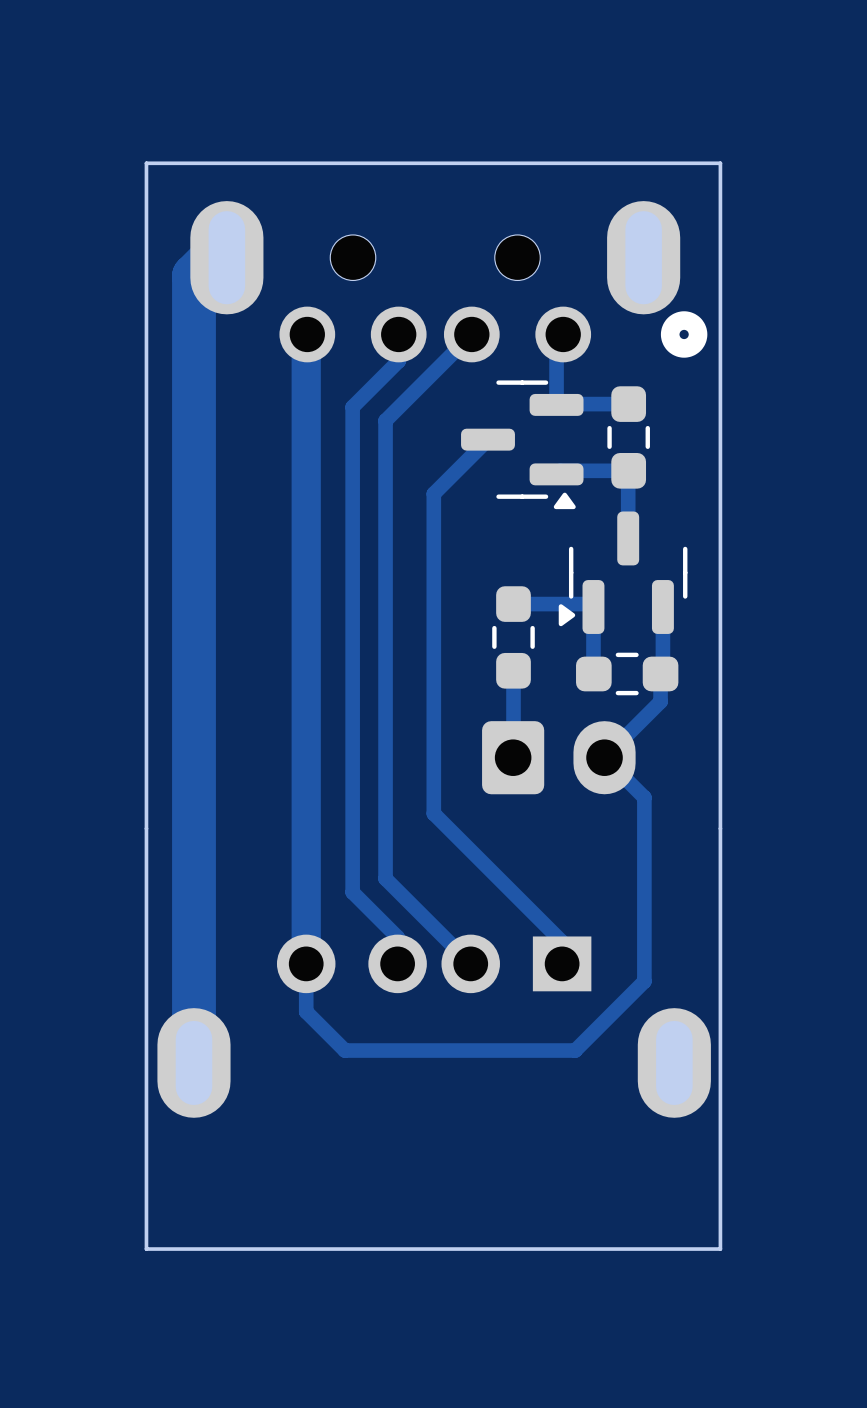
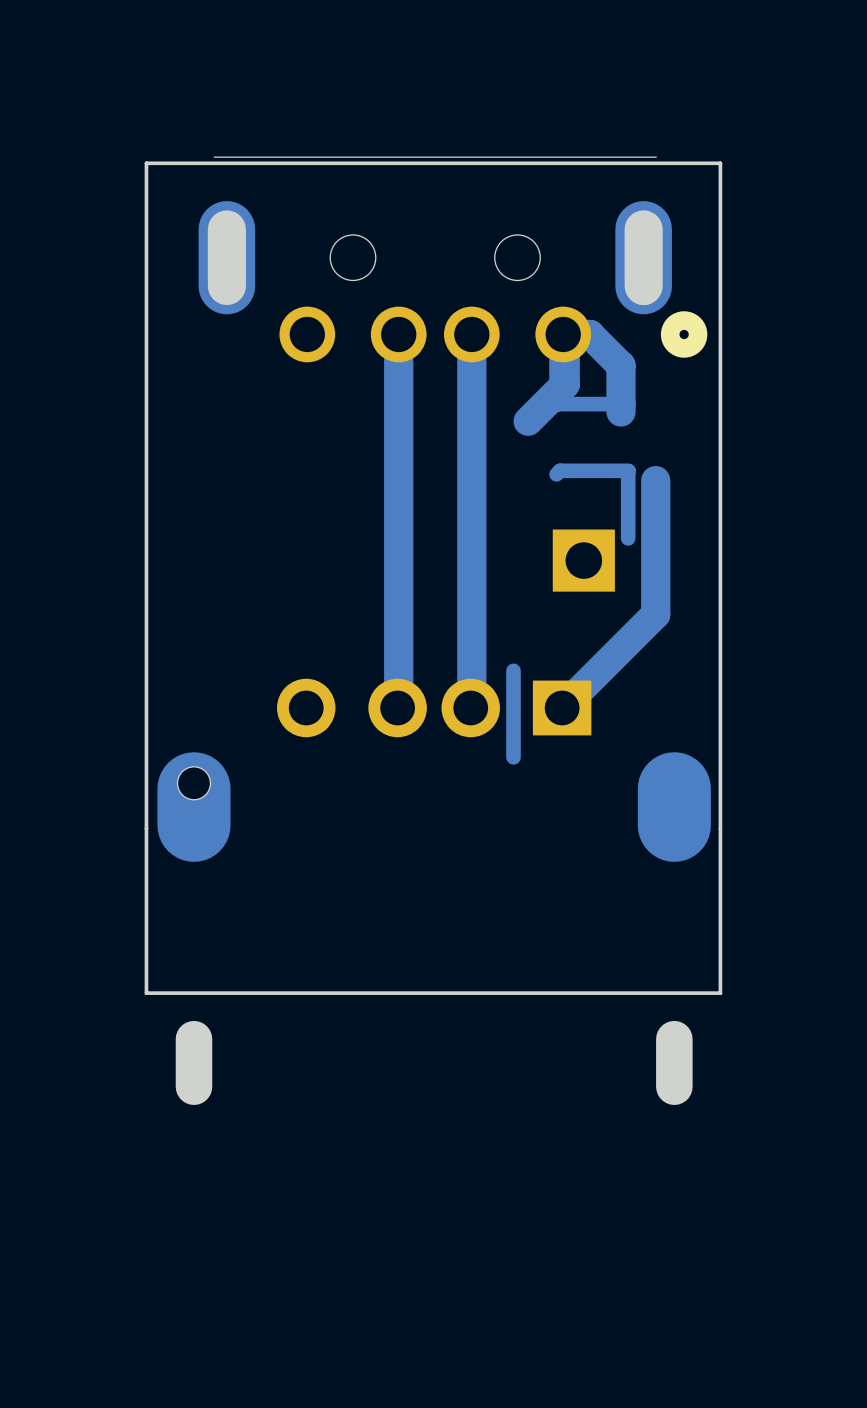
part footprint: [190, 201, 708, 363] -> [198, 156, 708, 363]
track: (212, 257) (193, 275) (193, 1062) -> none
track: (306, 335) (306, 1011) (344, 1050) (575, 1050) (644, 981) (644, 797) (604, 757) (660, 701) (660, 673) (662, 671) (662, 606) -> none
track: (470, 335) (385, 420) (385, 878) (470, 963) -> (470, 335) (471, 334) (470, 707)
track: (398, 361) (352, 407) (352, 892) (397, 937) (397, 963) -> (398, 361) (397, 707)
track: none -> (620, 392) (620, 412) (620, 365) (589, 334) (563, 334) (565, 336) (565, 384) (528, 421)
part: (628, 437) -> none
track: (488, 439) (433, 493) (433, 813) (562, 941) (562, 963) -> none
part: (522, 444) -> none
track: none -> (655, 480) (655, 614) (562, 707)
part: none -> (583, 560)
part: (623, 572) -> none
track: (513, 604) (590, 604) (593, 606) (593, 673) -> none
part: (513, 637) -> none
part: (627, 673) -> none
part: (558, 757) -> none
part: none -> (193, 783)
board edge: (720, 993) (720, 1249) (146, 1249) (146, 993) -> (720, 993) (146, 993)
part position: (434, 1026) -> (434, 770)

